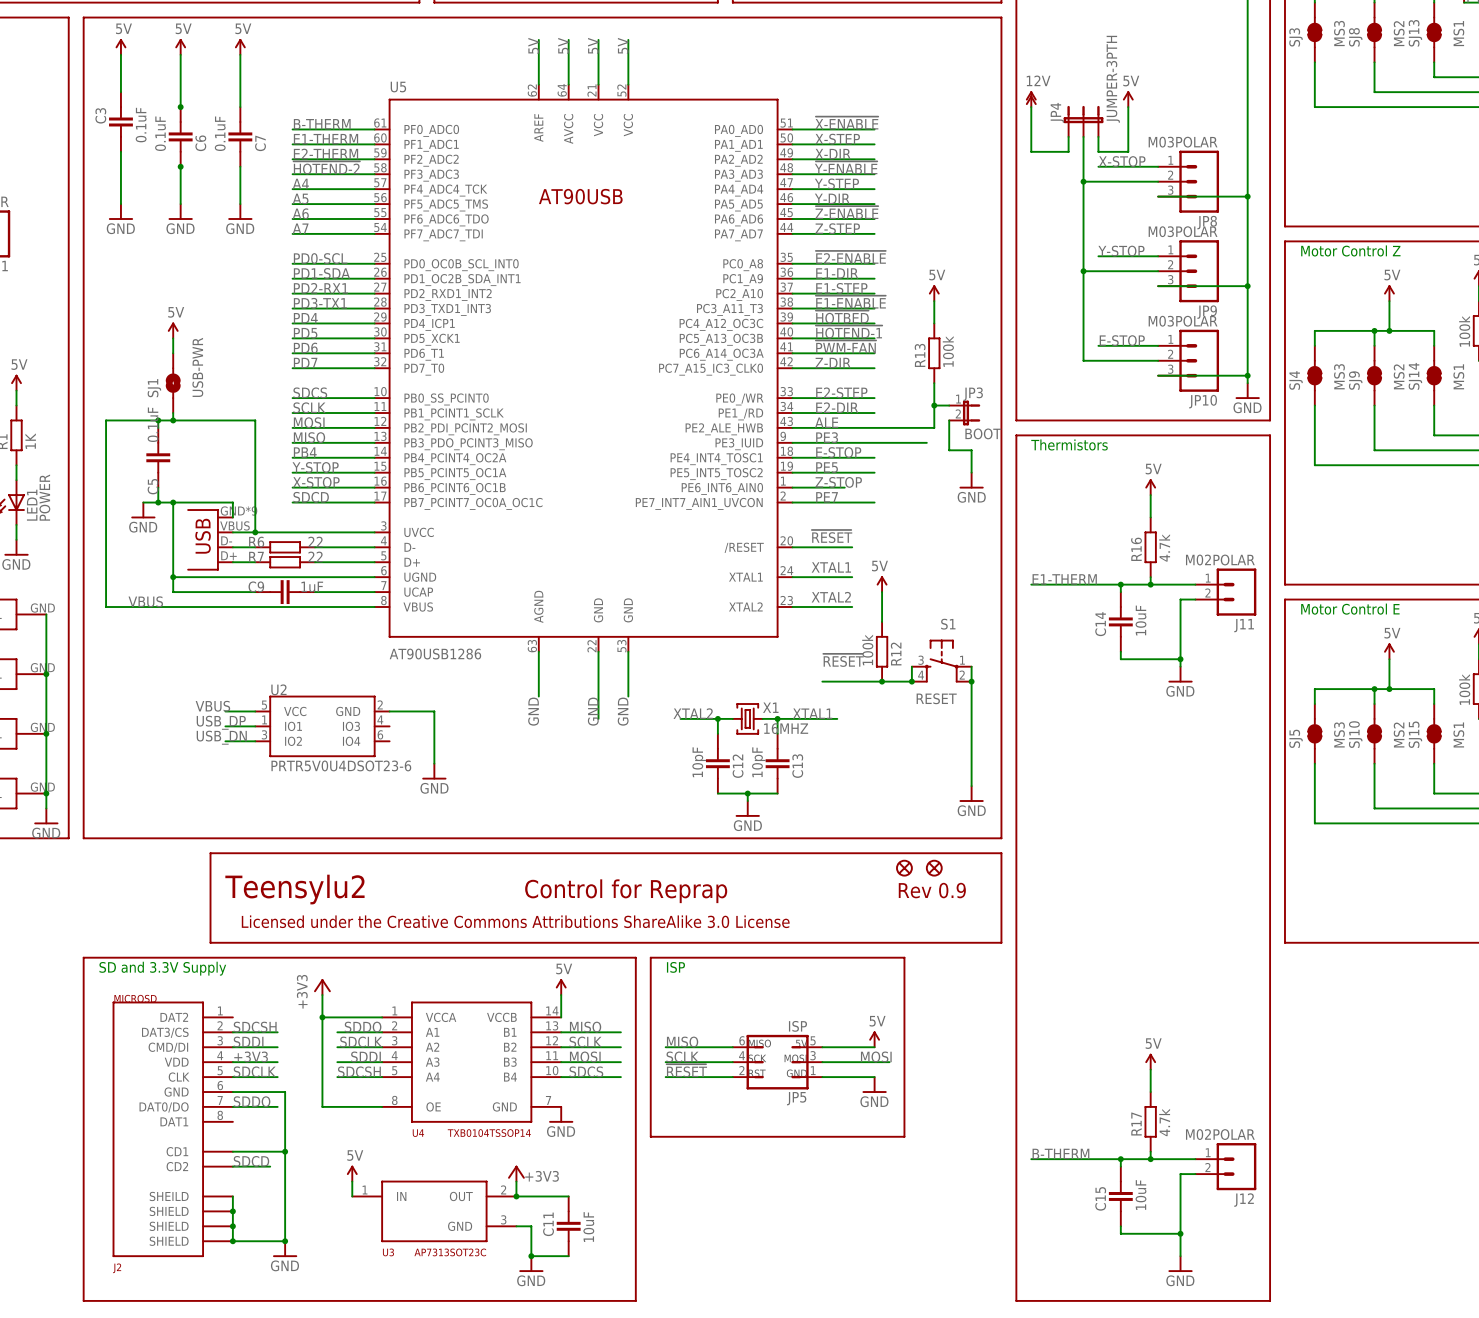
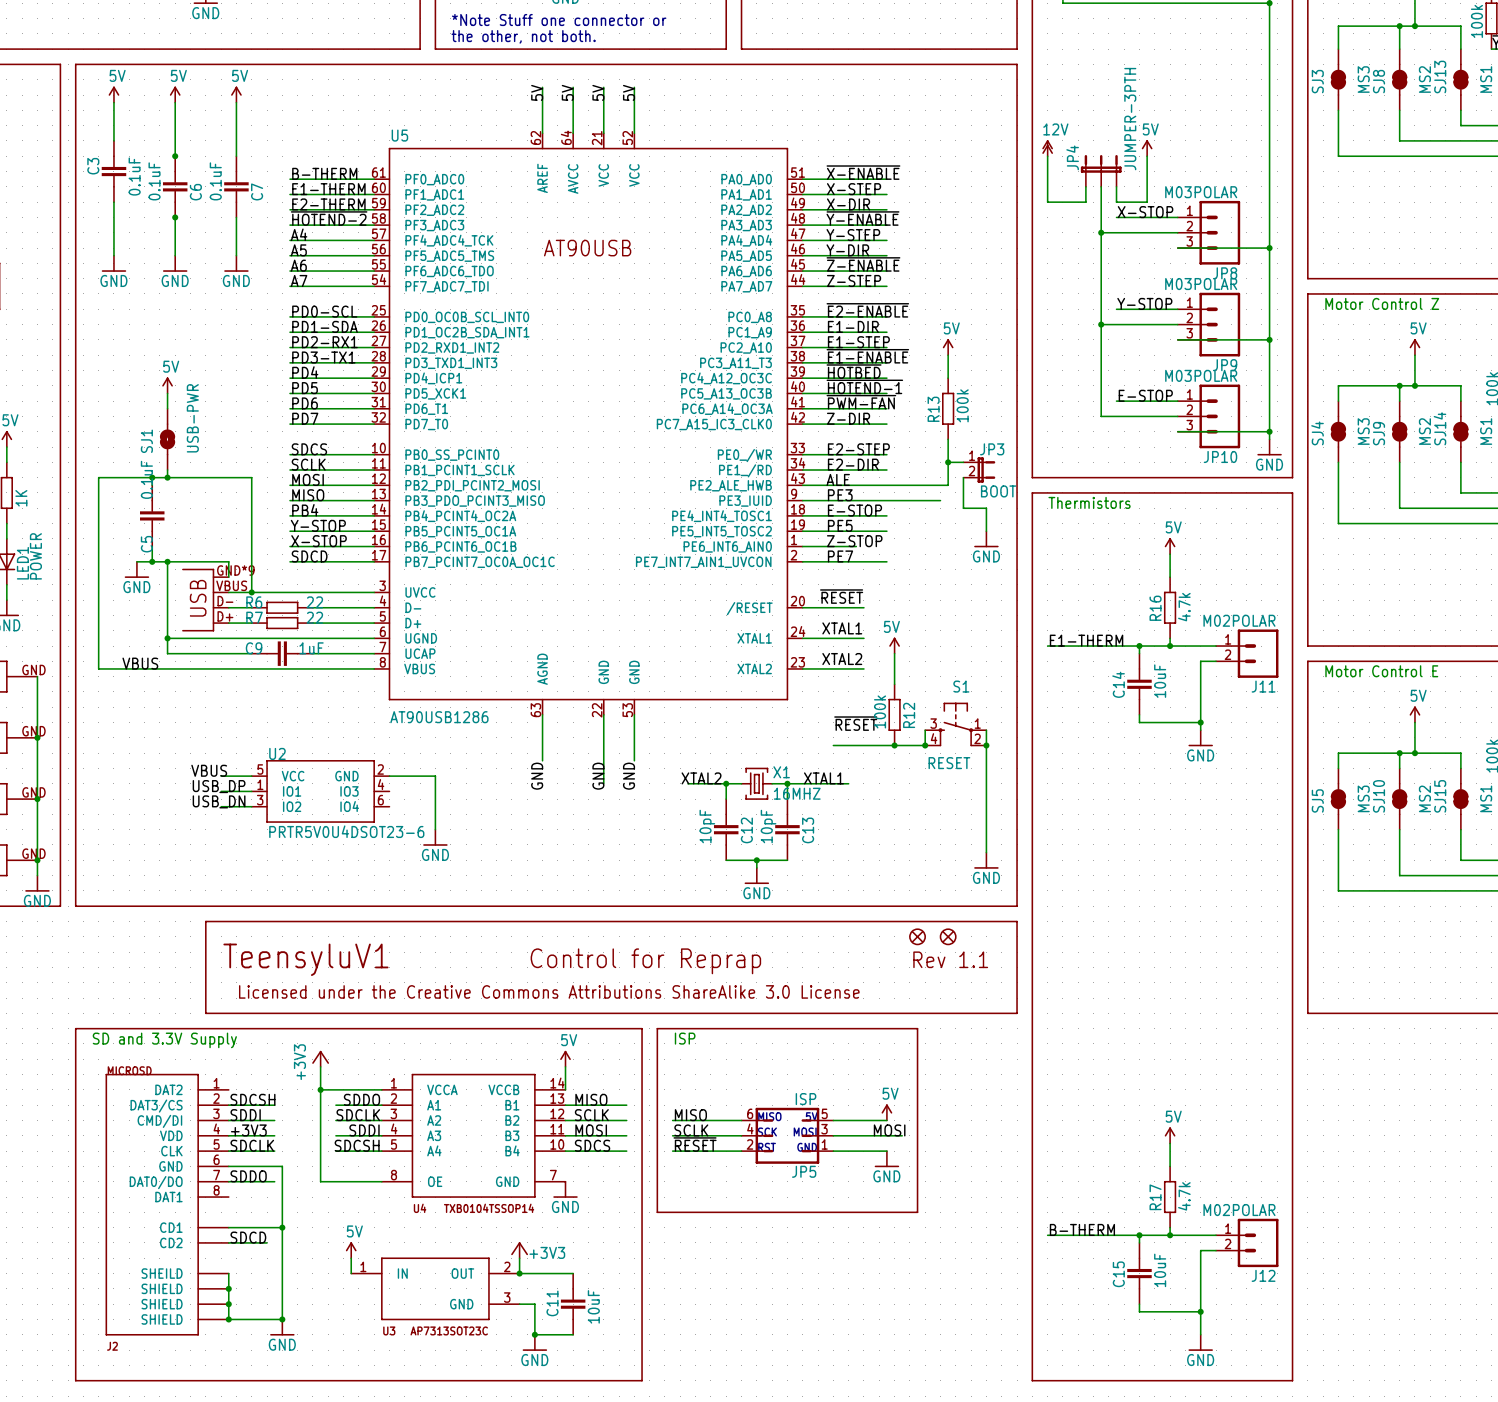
text: Teensylu2 (294, 889) -> TeensyluV1 (305, 959)
text: Rev 0.9 (932, 890) -> Rev 1.1 (950, 959)

